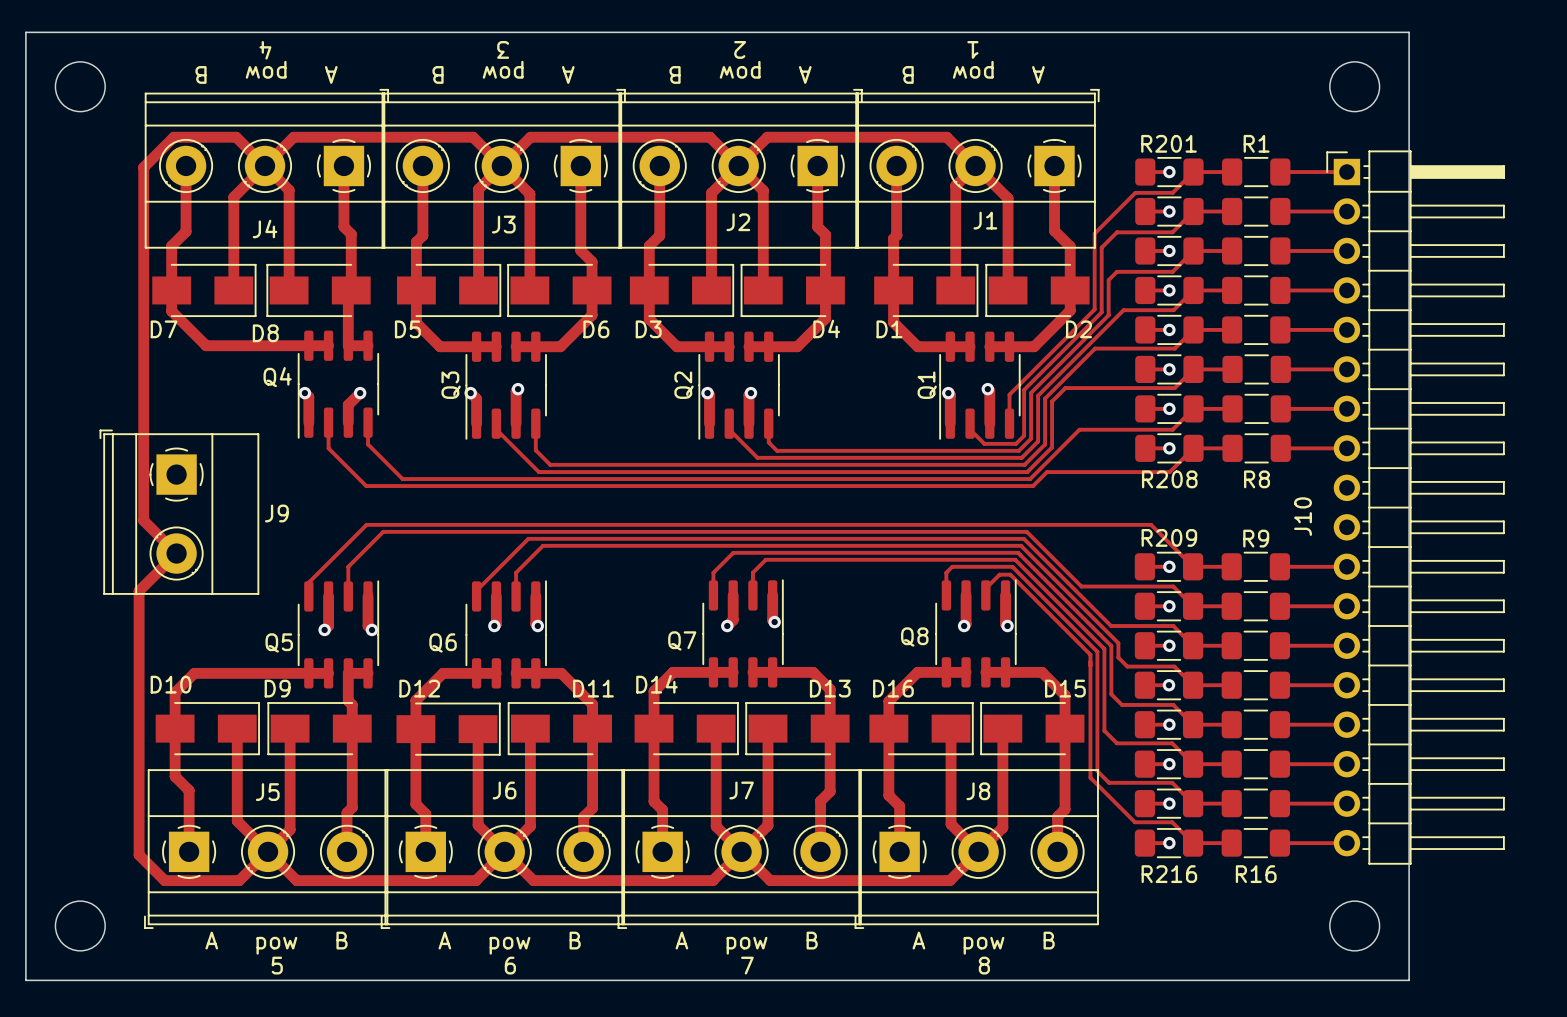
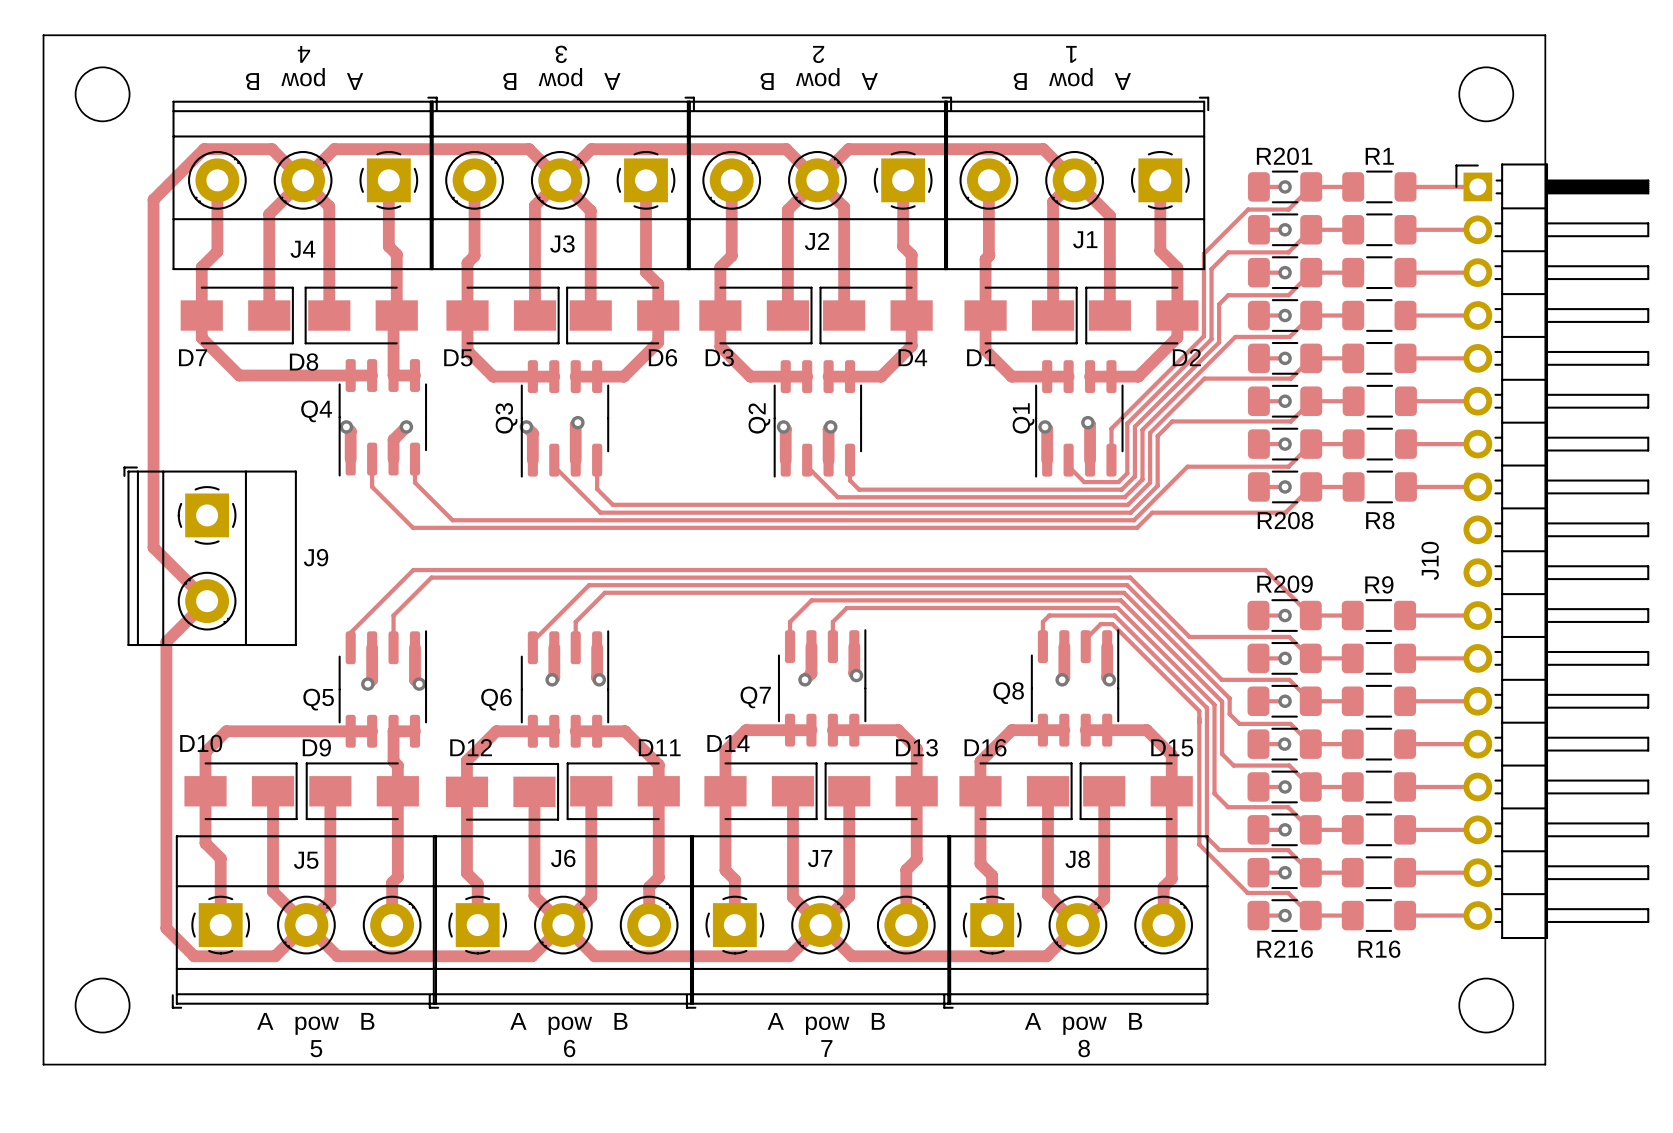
top track: (143, 167) (143, 520) -> (171, 181) (153, 199) (153, 547) (171, 565)

